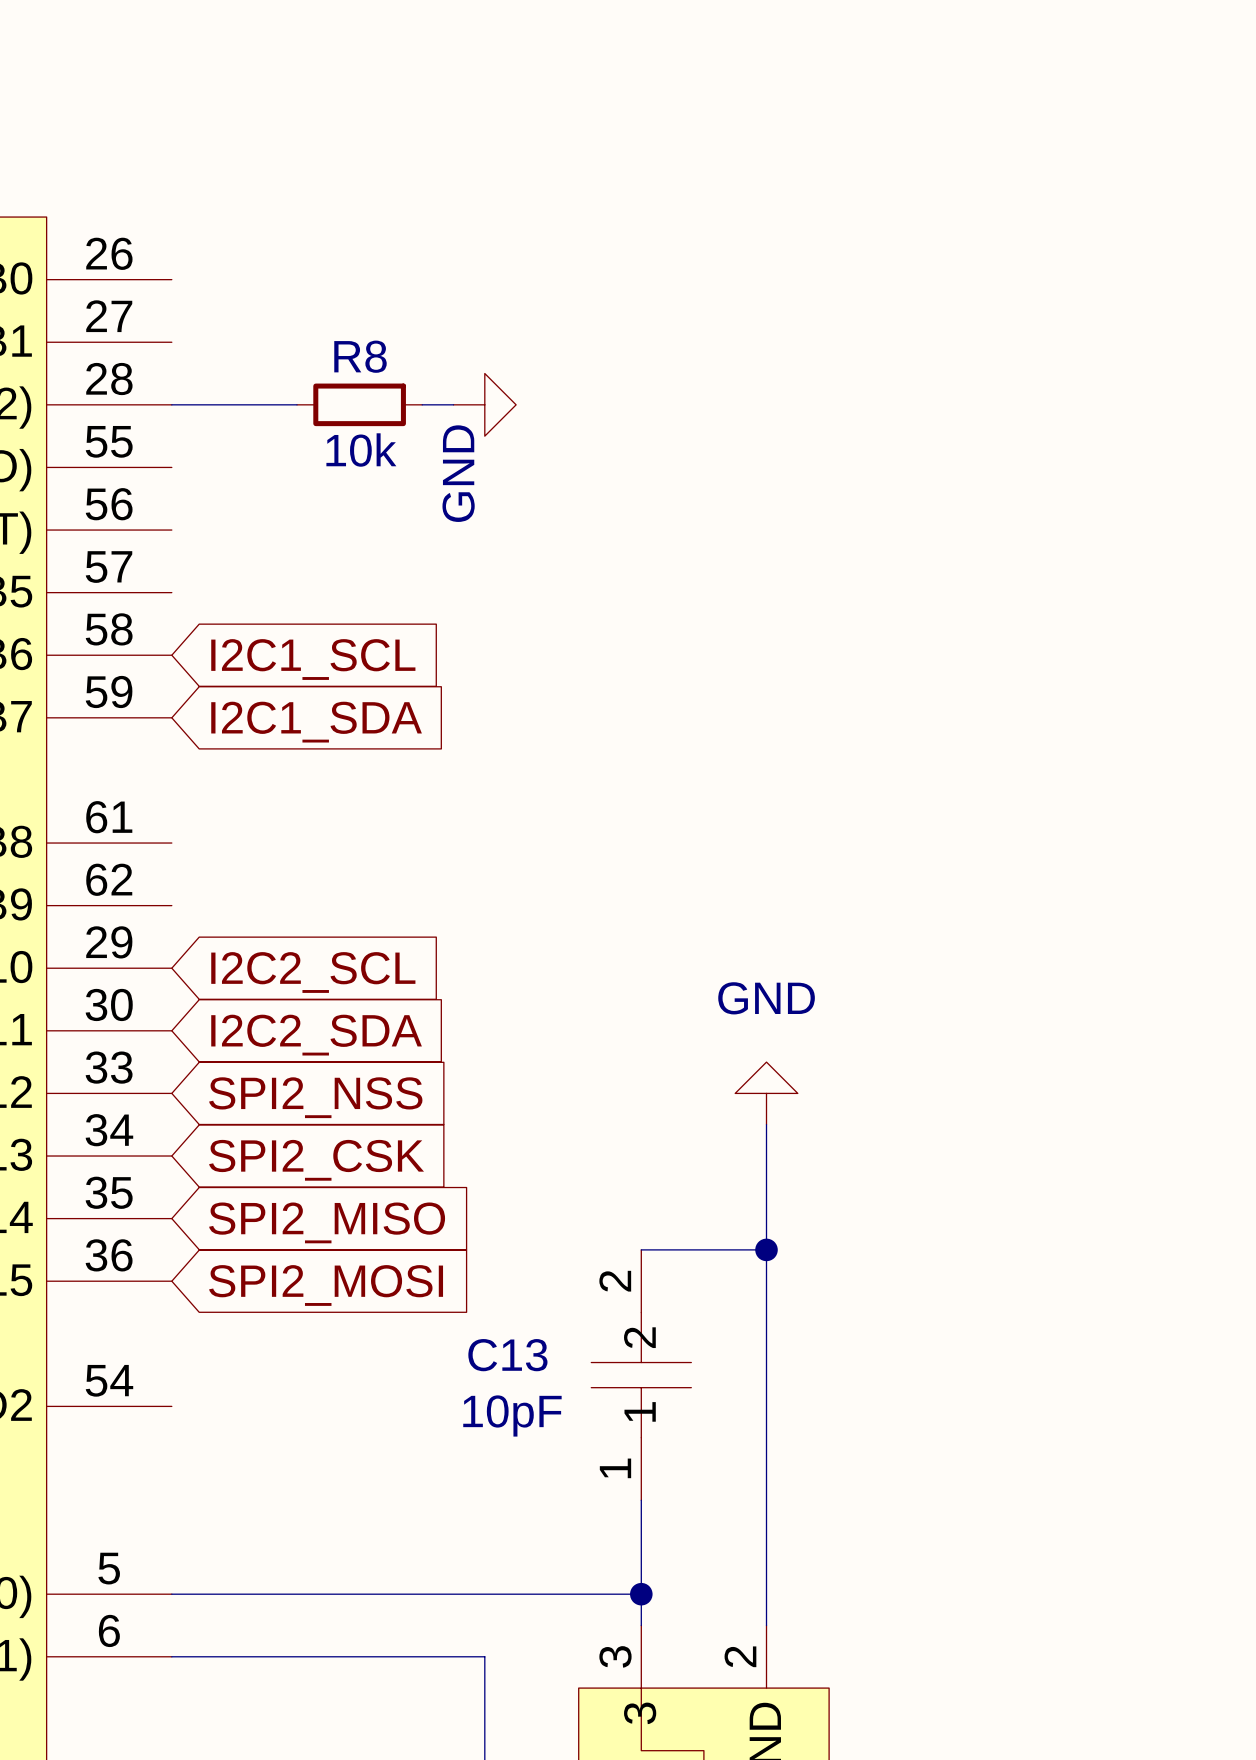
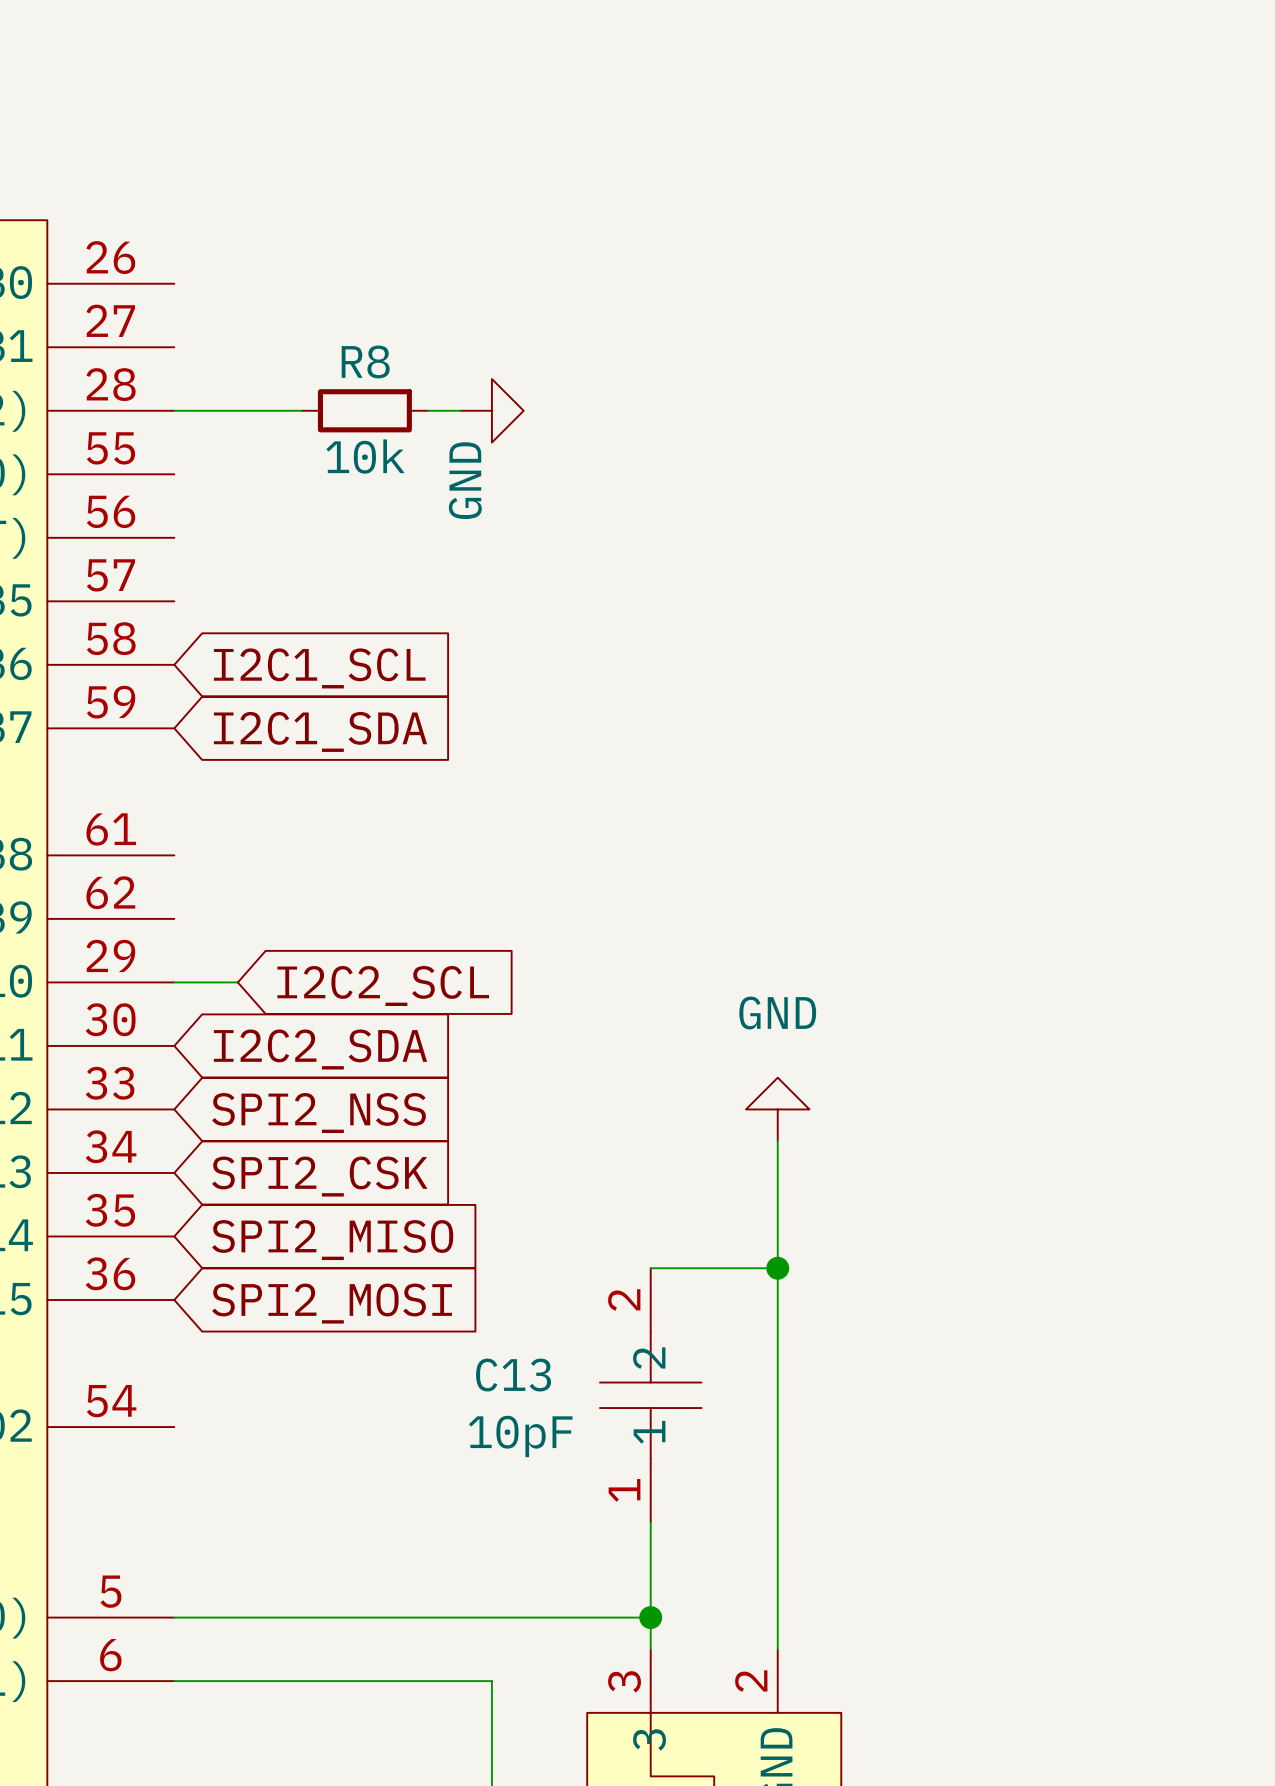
wire: none -> (174, 982) (237, 982)
global label position: I2C2_SCL (313, 972) -> I2C2_SCL (383, 985)

